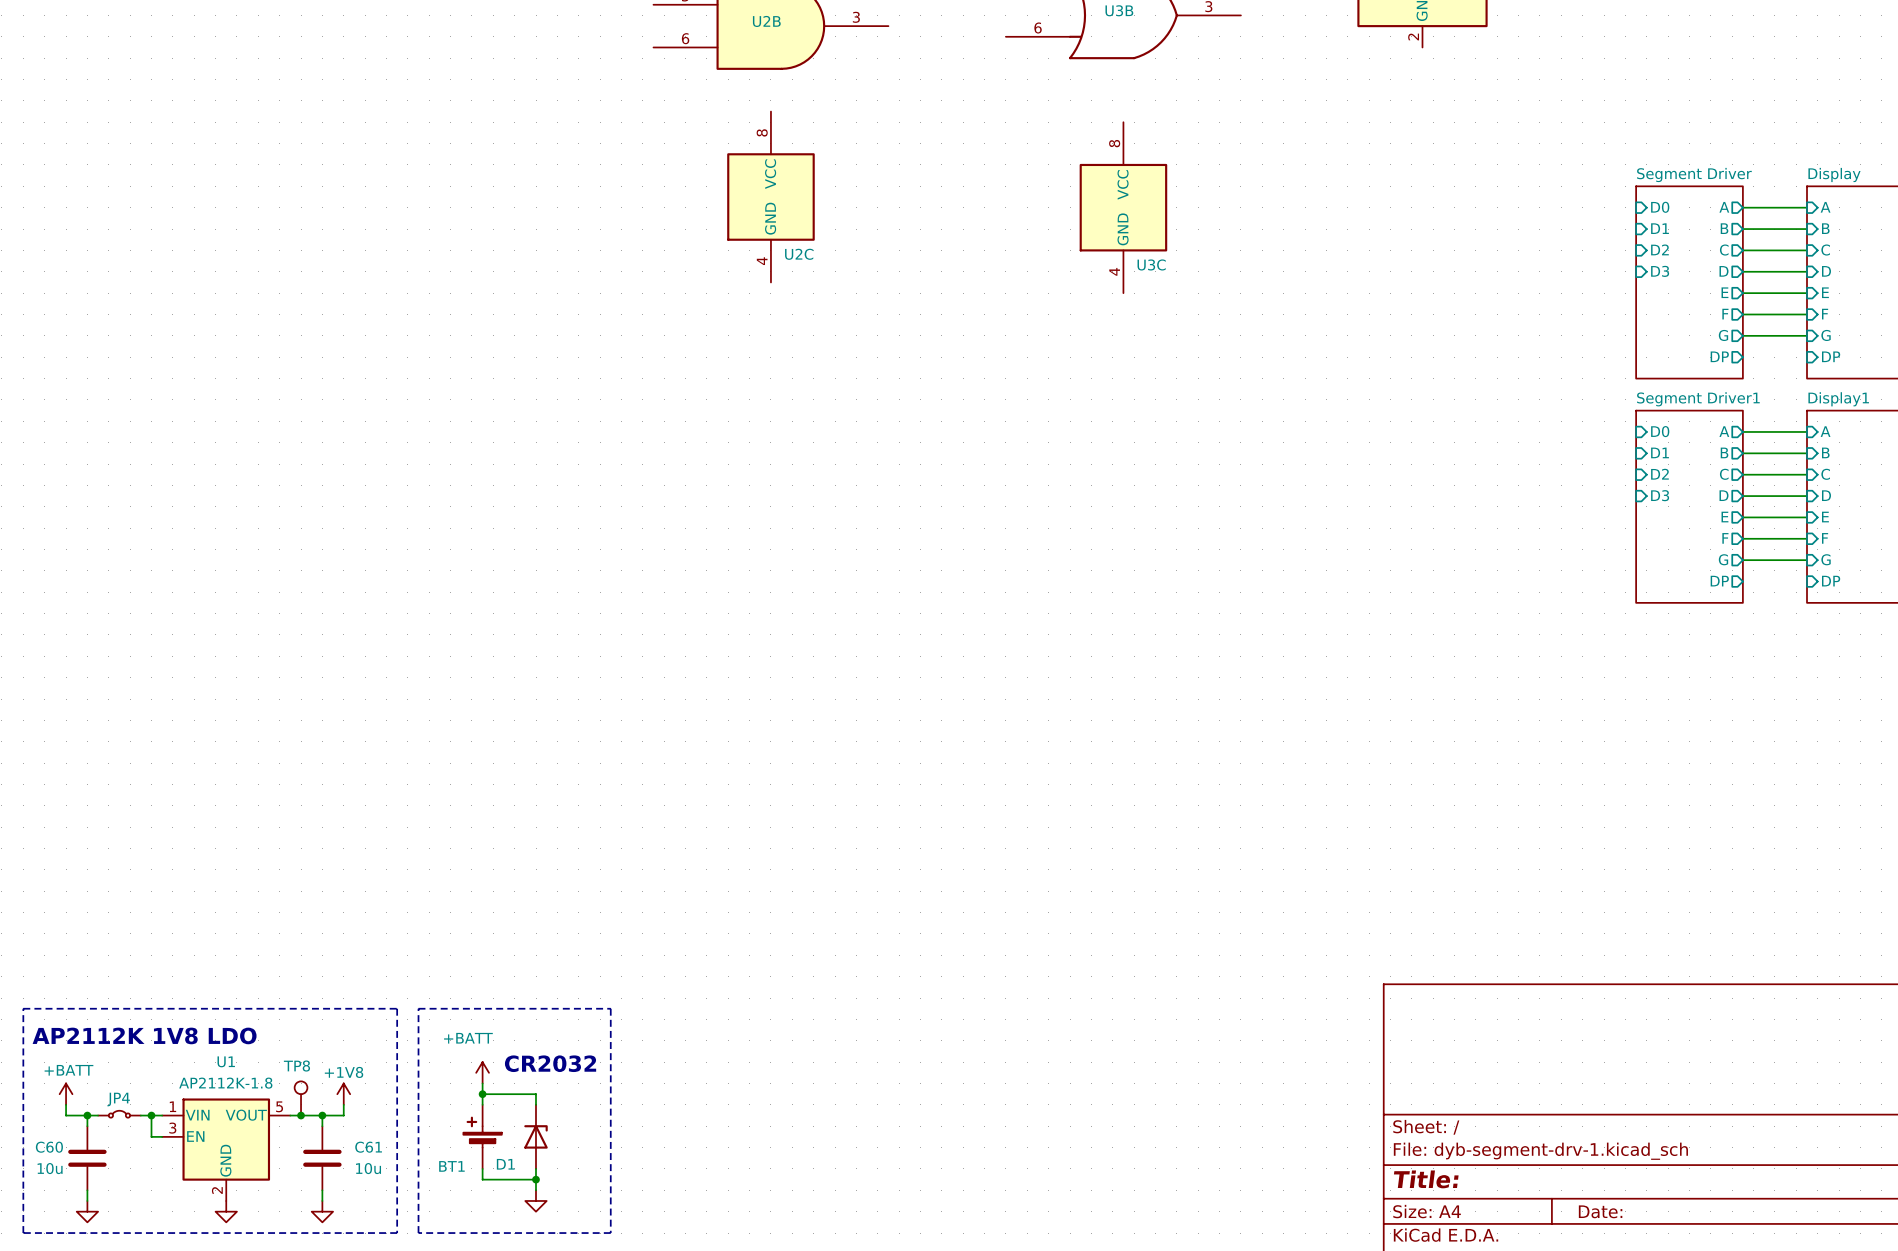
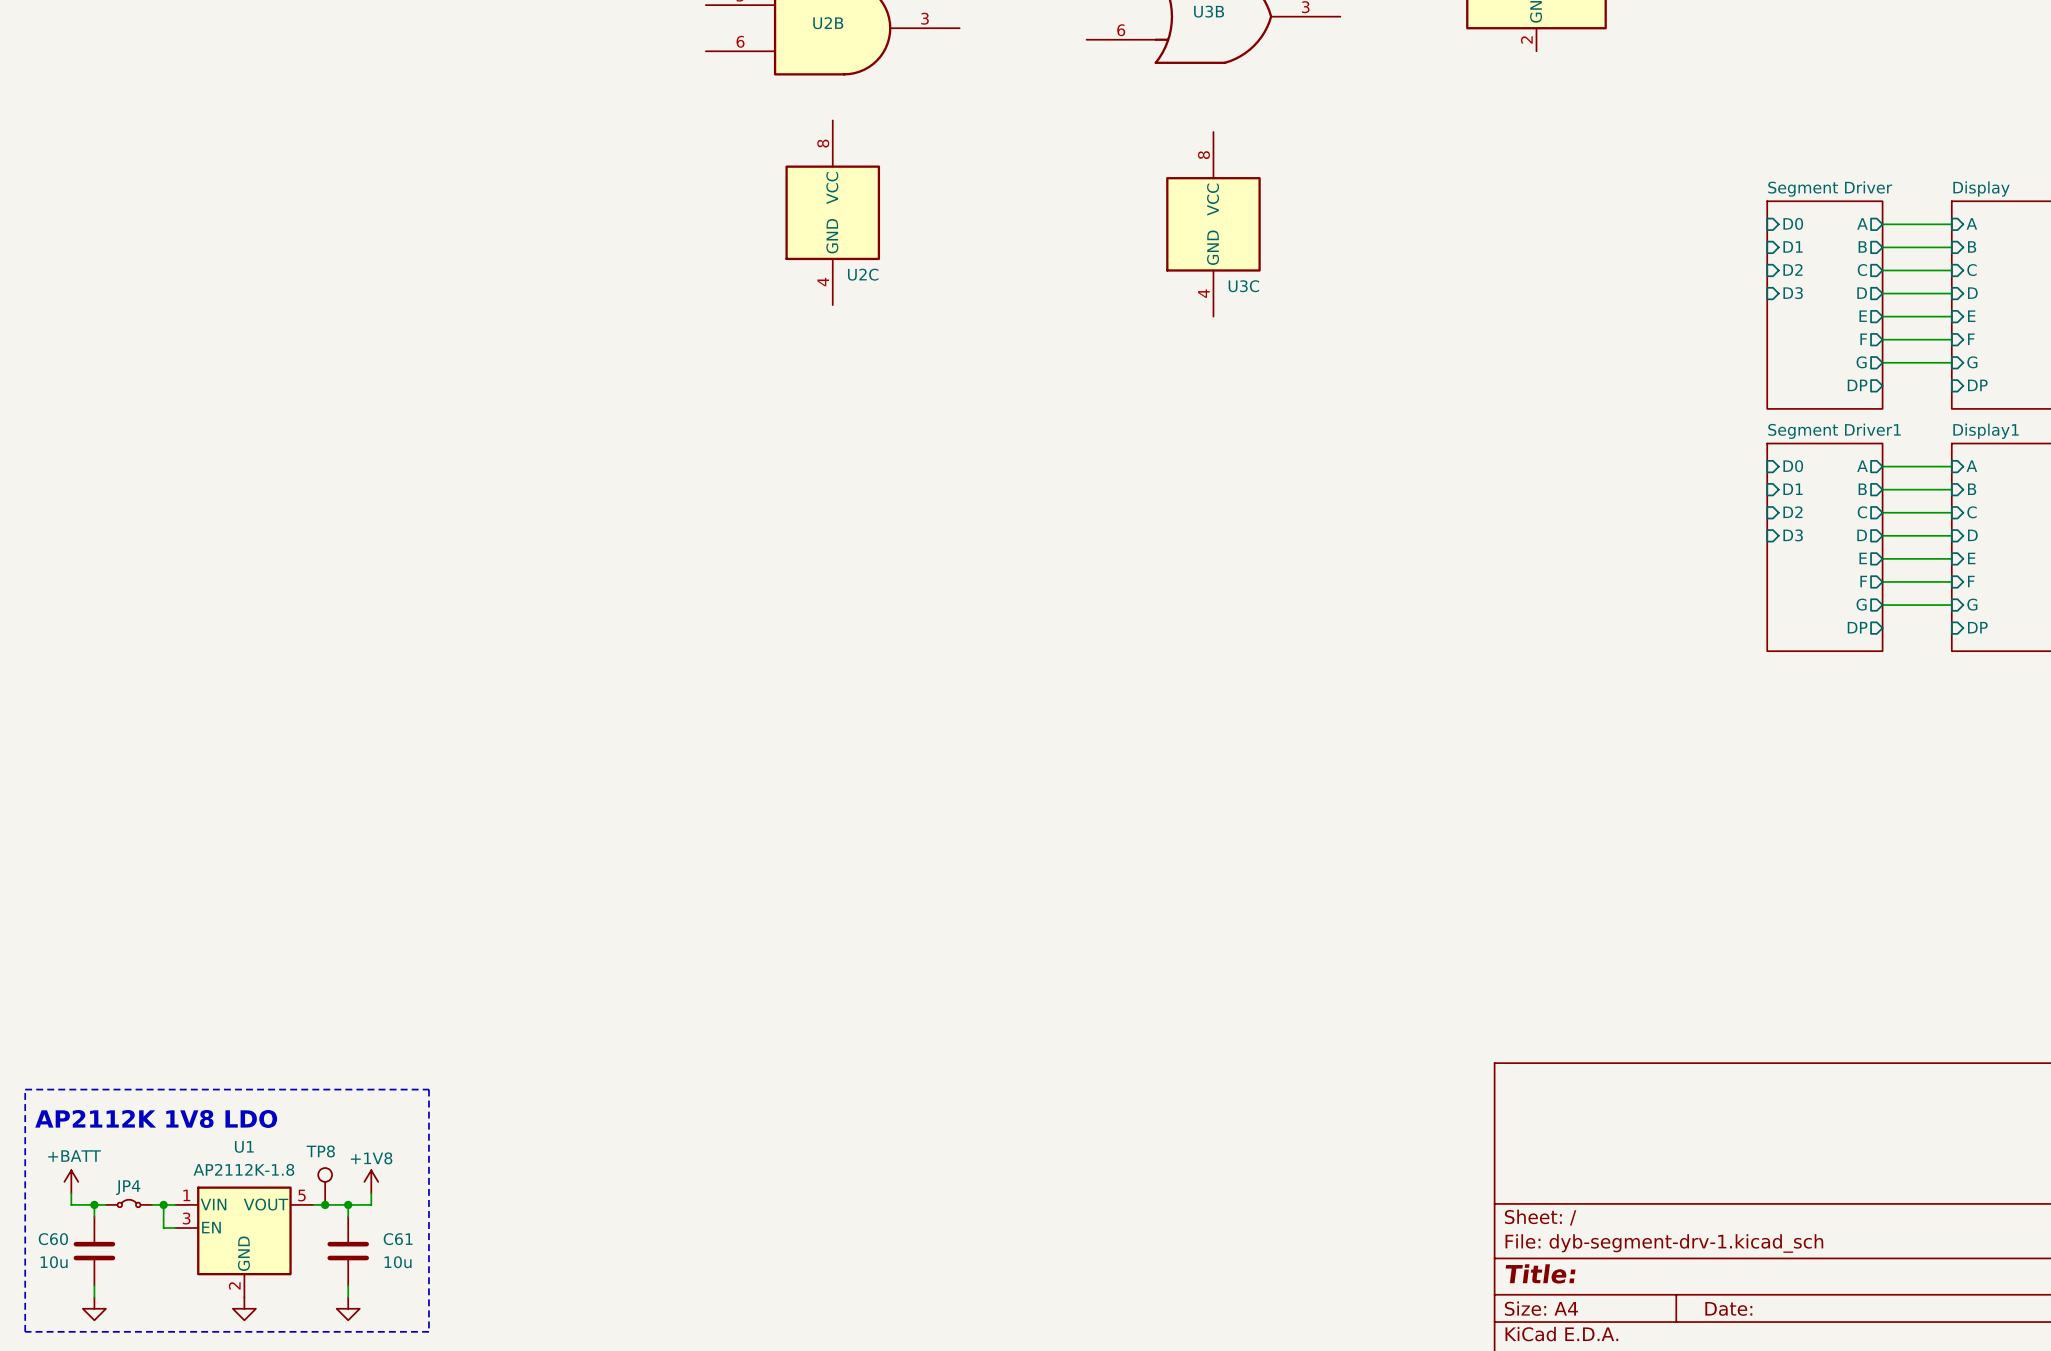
line: (418, 1008) (610, 1008) (610, 1233) (418, 1233) (418, 1008) -> none
text: CR2032 (550, 1063) -> none
power symbol: +BATT (482, 1072) -> none
wire: (482, 1083) (482, 1104) -> none
wire: (482, 1094) (536, 1094) (536, 1104) -> none
junction: (482, 1094) -> none
BT1: (482, 1136) -> none
D1: (536, 1136) -> none
wire: (482, 1168) (482, 1179) (536, 1179) -> none
wire: (536, 1168) (536, 1190) -> none
junction: (536, 1179) -> none
power symbol: (536, 1200) -> none

